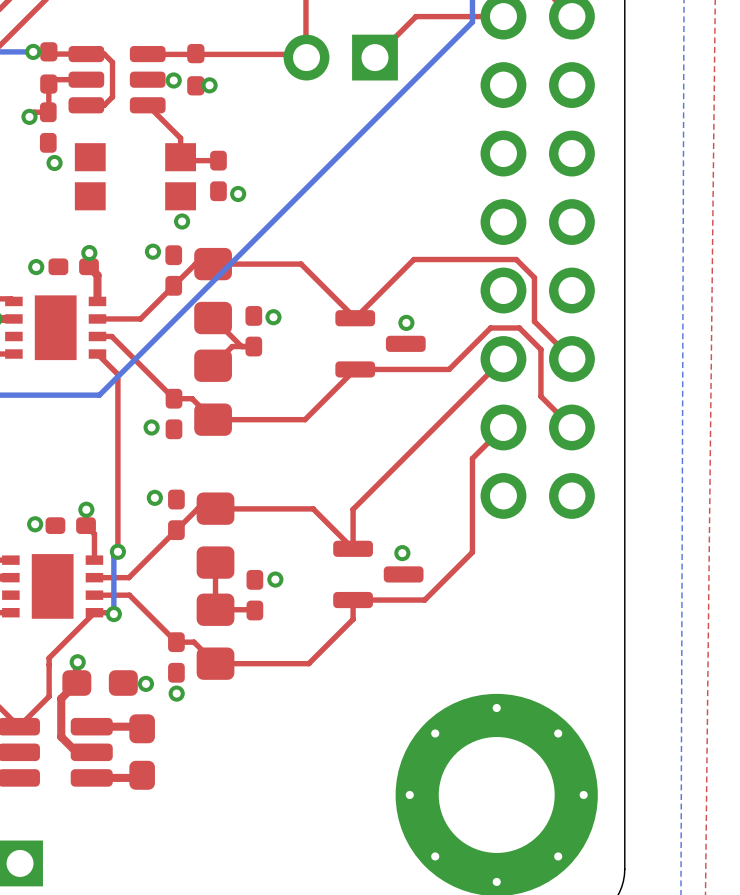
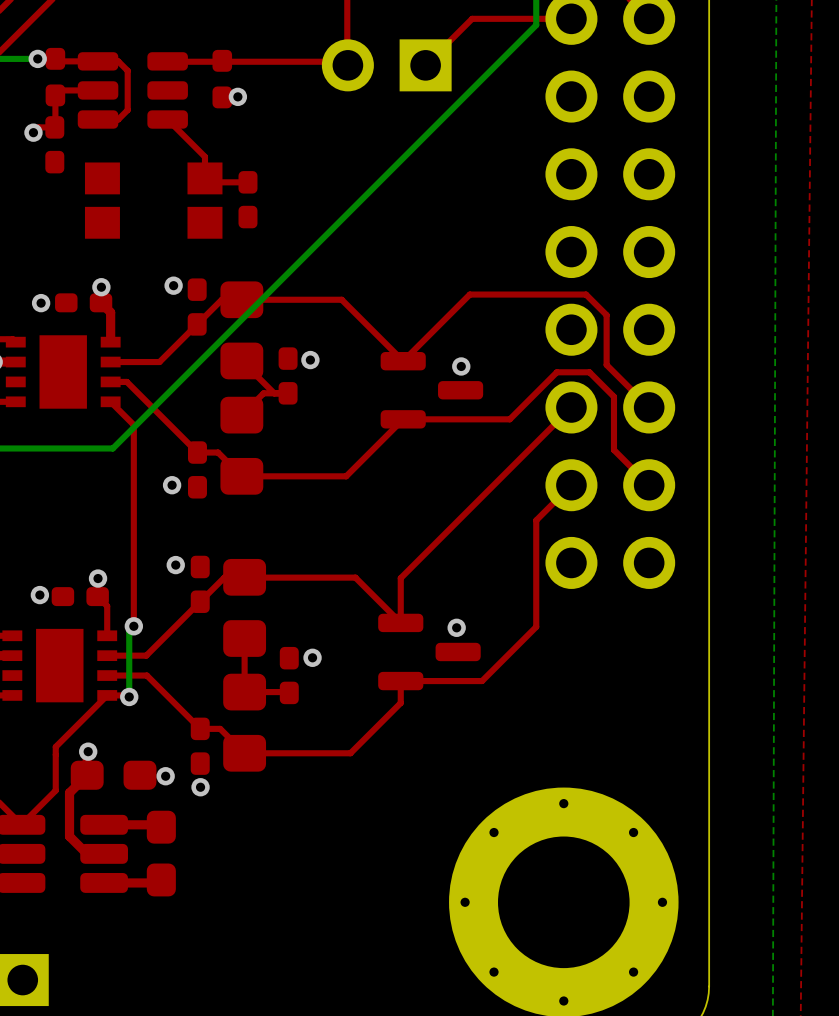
via: (173, 80) -> none
via: (54, 162) -> none
via: (238, 194) -> none
via: (182, 221) -> none

